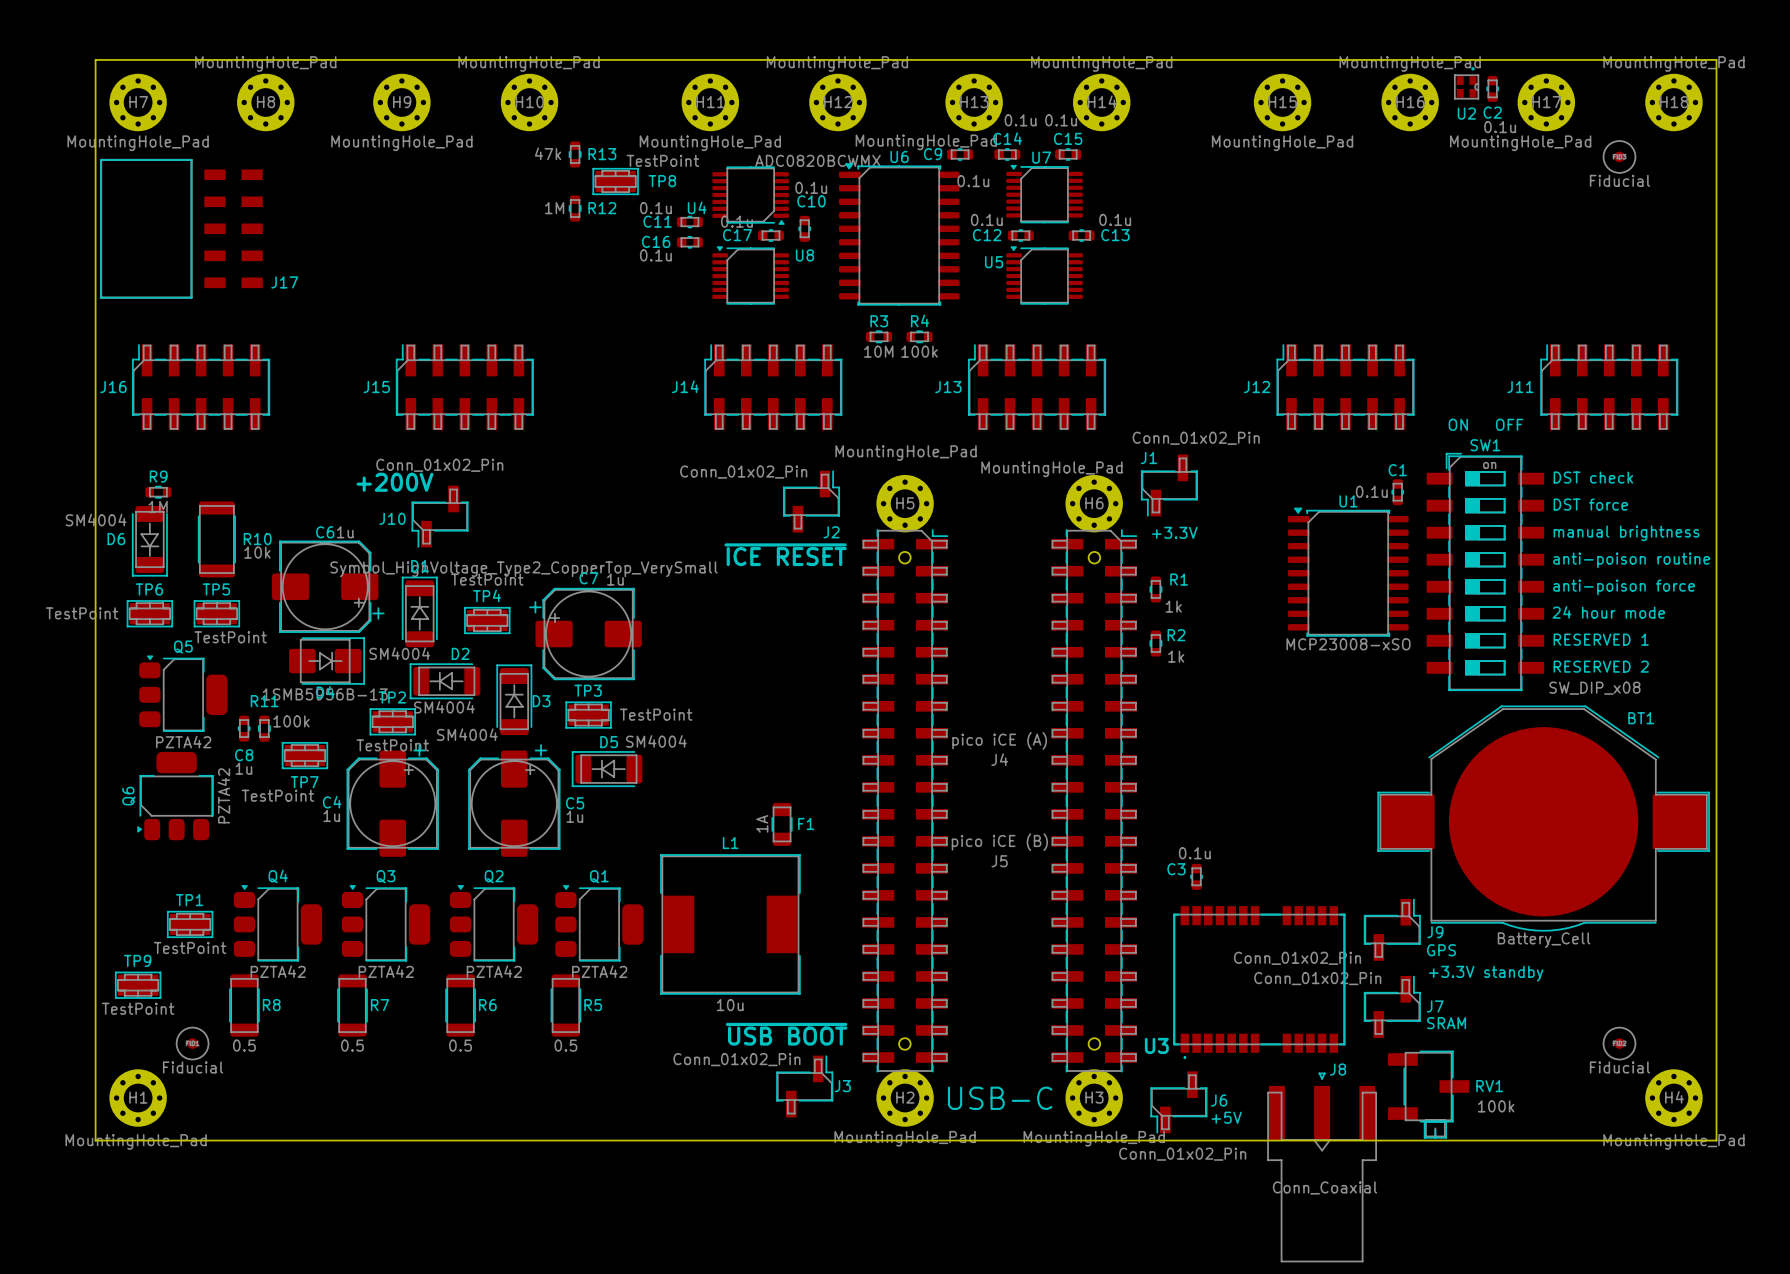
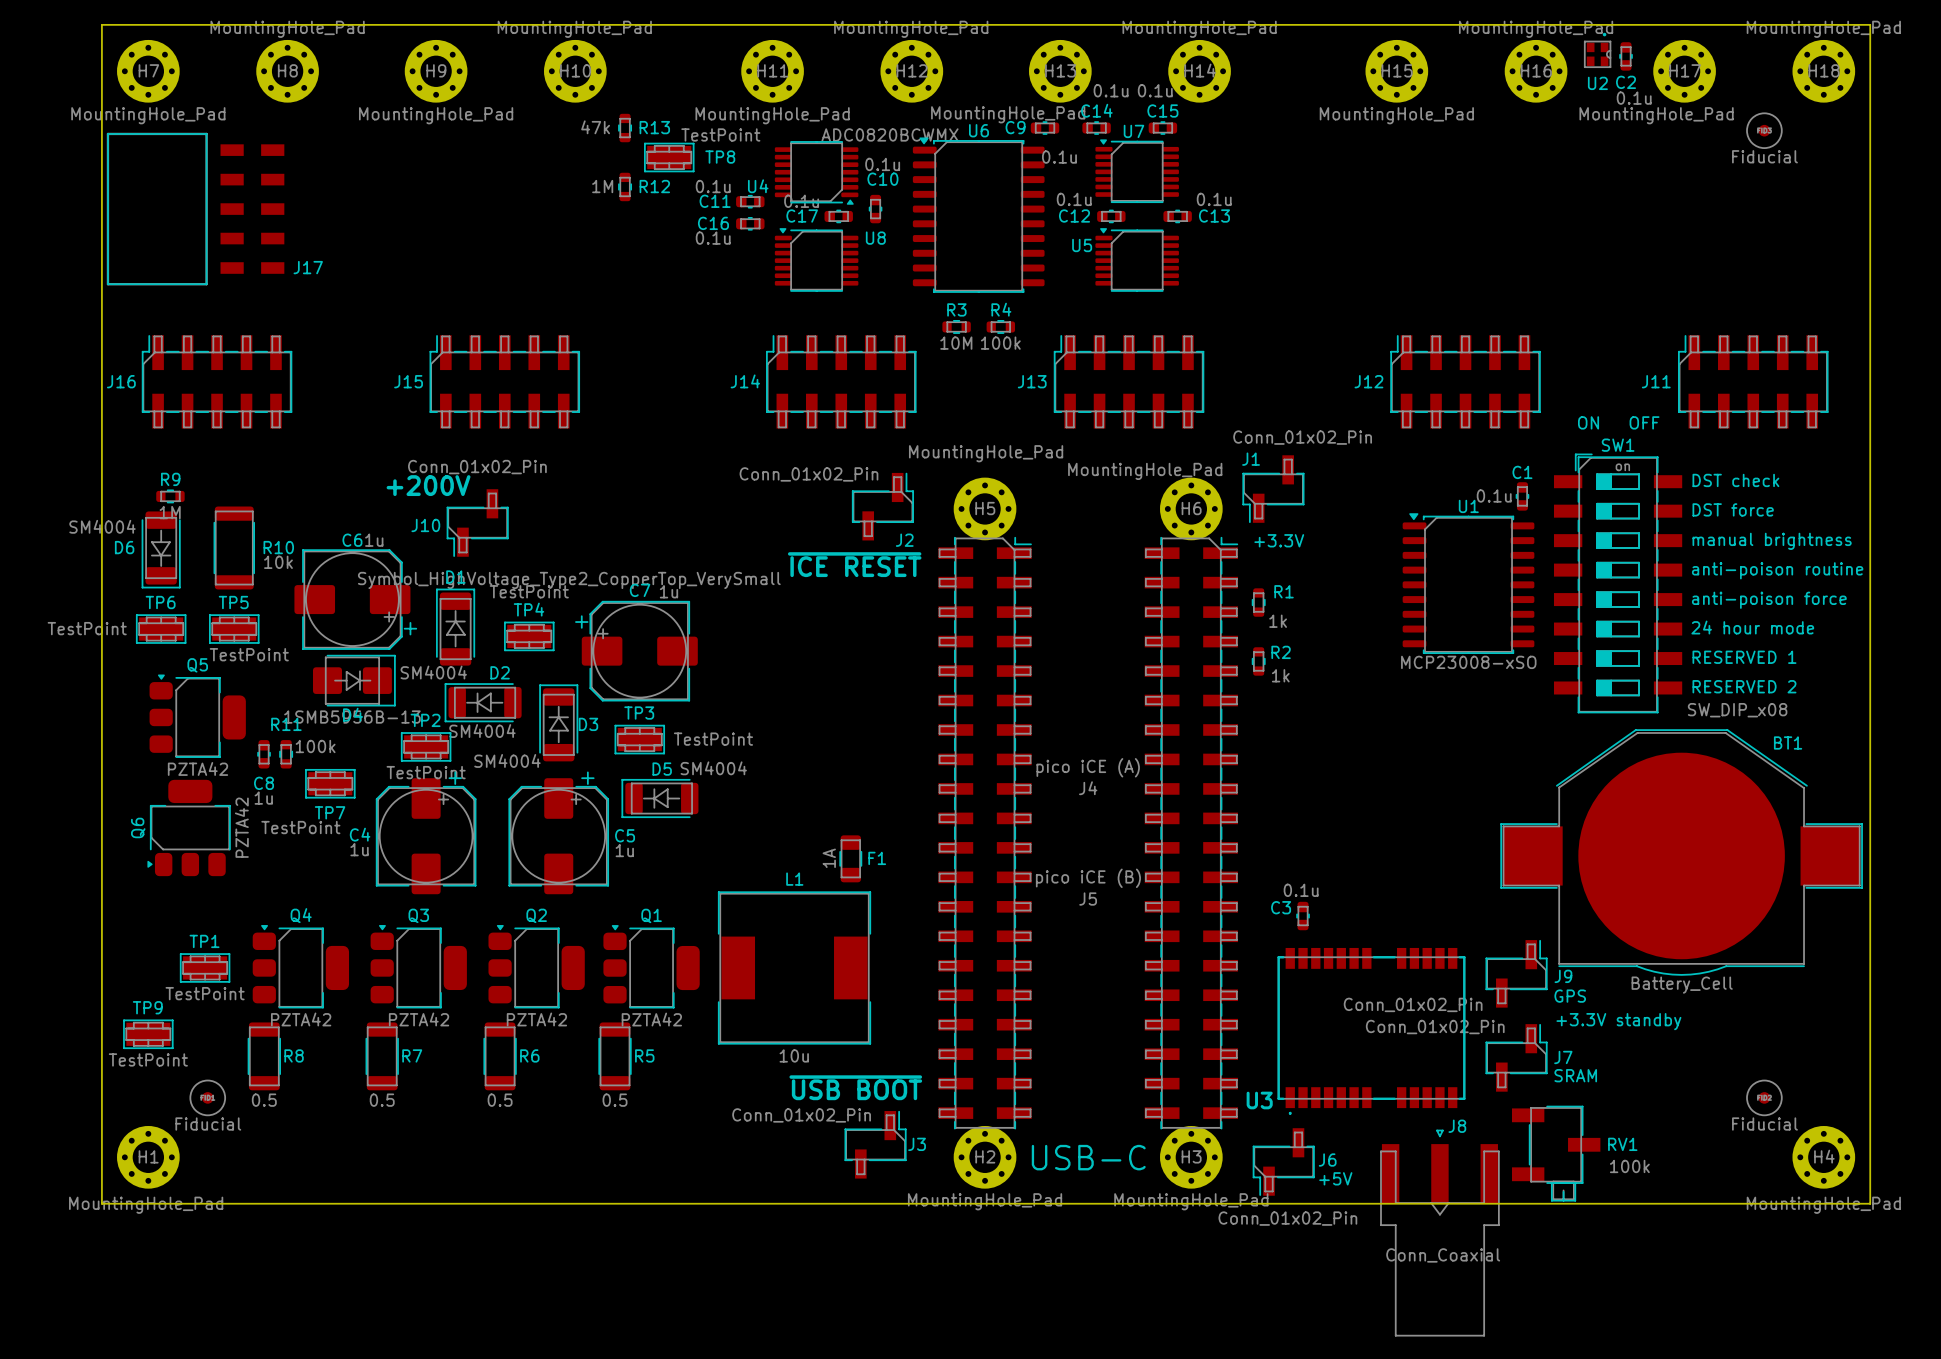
J4 footprint: [862, 529, 948, 1073] -> [938, 537, 1032, 1130]
J5 footprint: [1051, 529, 1137, 1073] -> [1144, 537, 1238, 1130]

